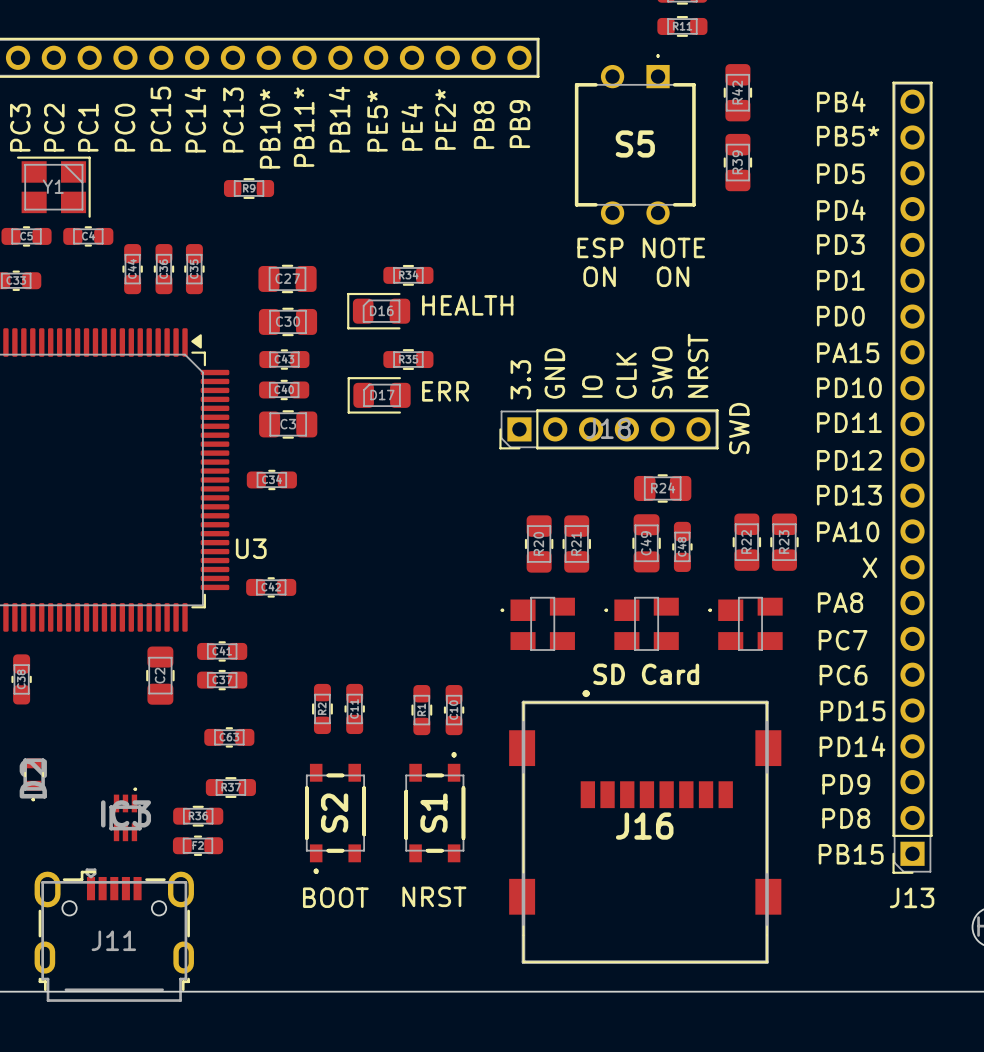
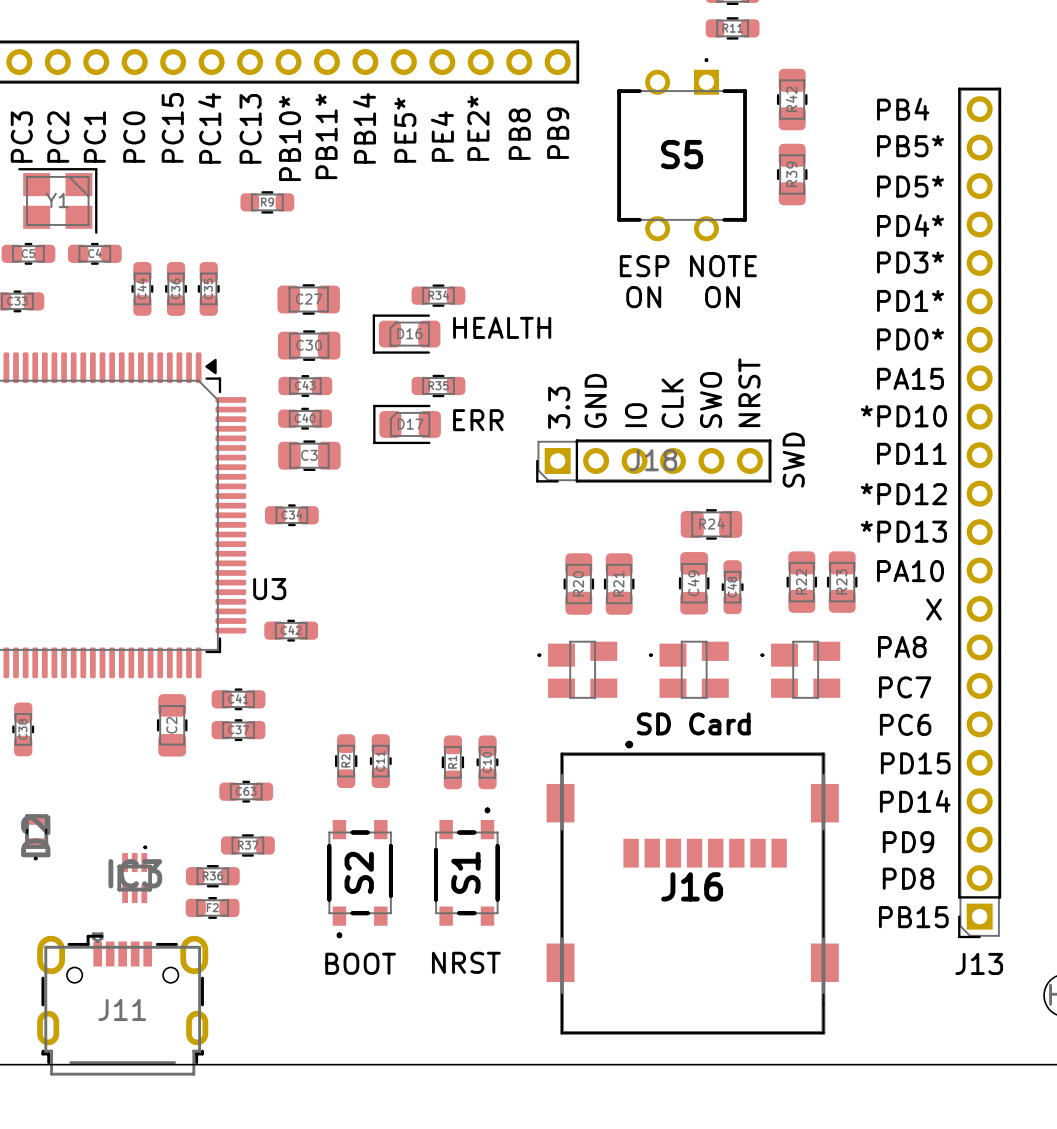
text: PD5 (840, 173) -> PD5* (910, 186)
text: PD4 (841, 210) -> PD4* (910, 225)
text: PD3 (840, 244) -> PD3* (910, 262)
text: PD1 (840, 280) -> PD1* (910, 300)
text: PD0 (840, 316) -> PD0* (910, 339)
text: PD10 (849, 387) -> *PD10 (903, 416)
text: PD12 (849, 460) -> *PD12 (903, 494)
text: PD13 (849, 495) -> *PD13 (903, 531)

